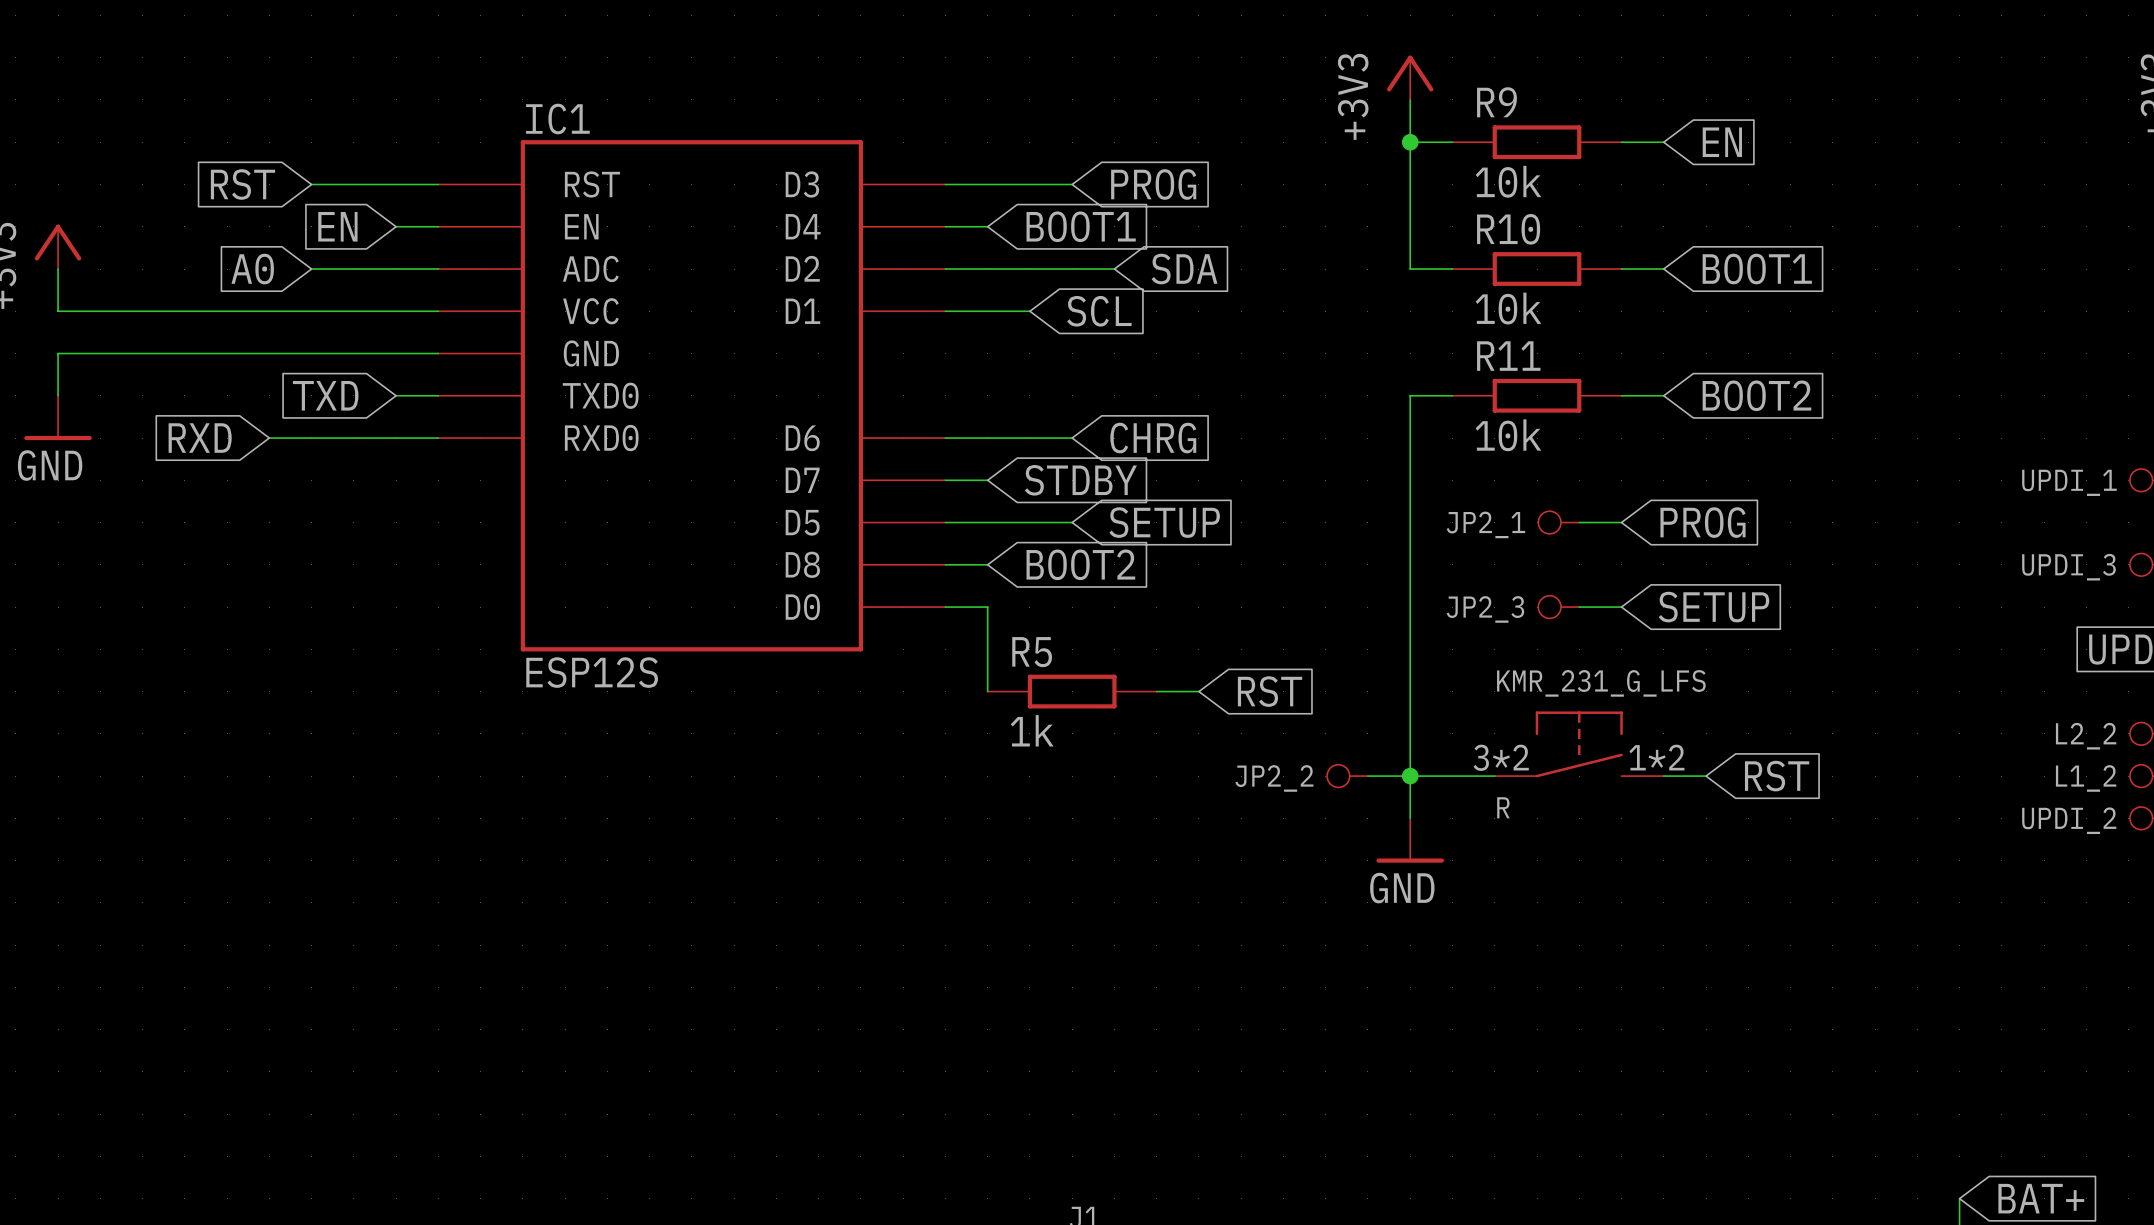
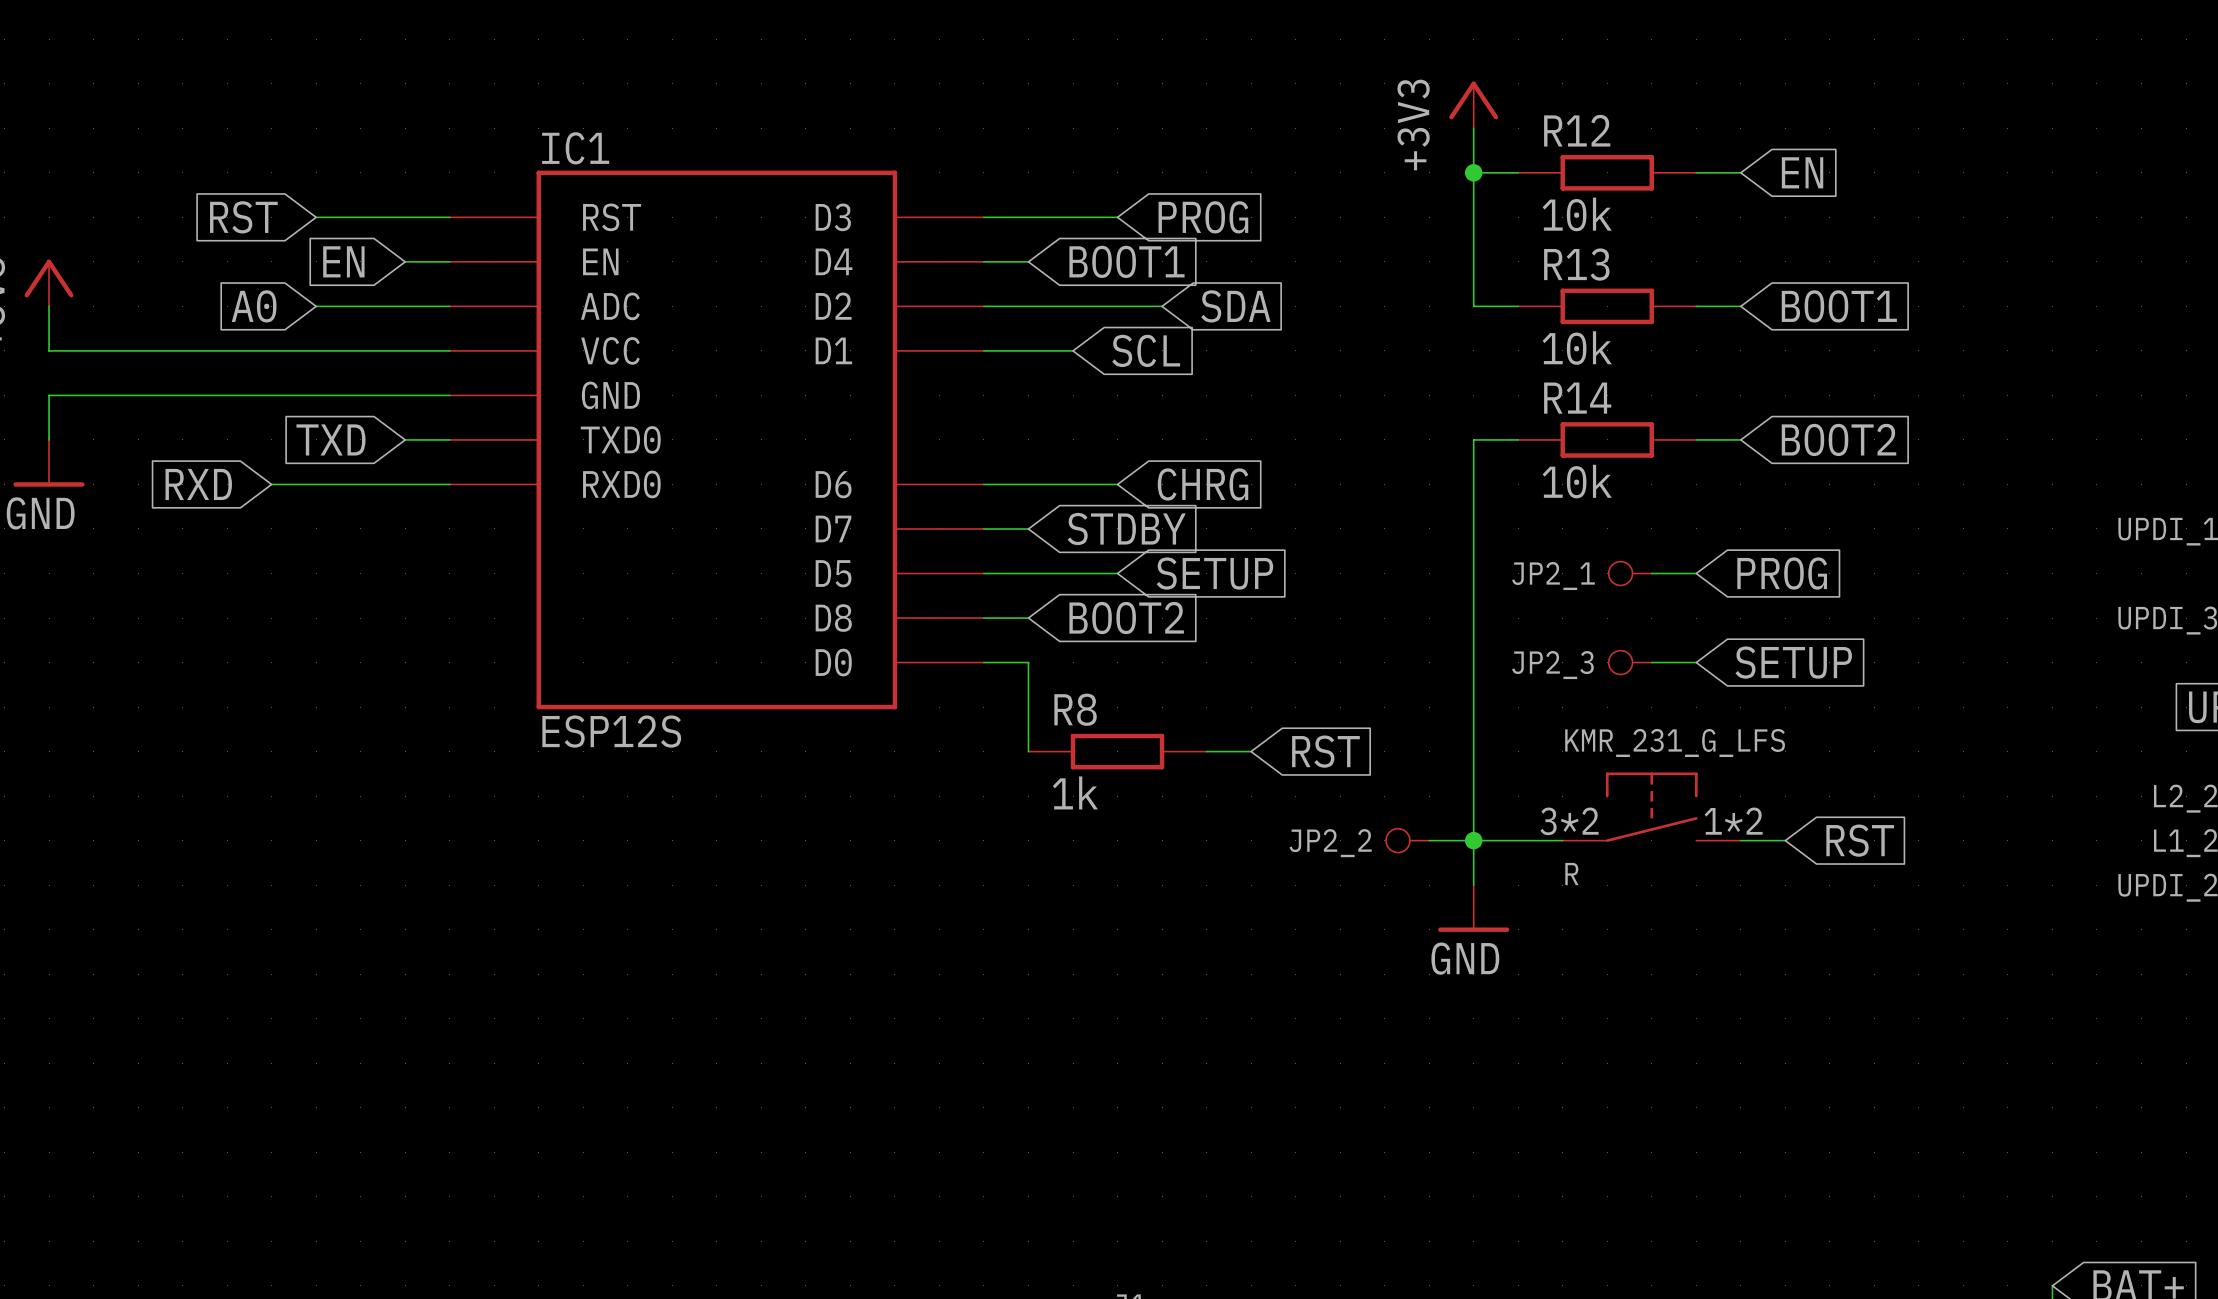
R9 name: R9 (1497, 102) -> R12 (1577, 130)
R10 name: R10 (1508, 229) -> R13 (1576, 264)
R11 name: R11 (1508, 356) -> R14 (1577, 398)
R5 name: R5 (1032, 652) -> R8 (1075, 709)

